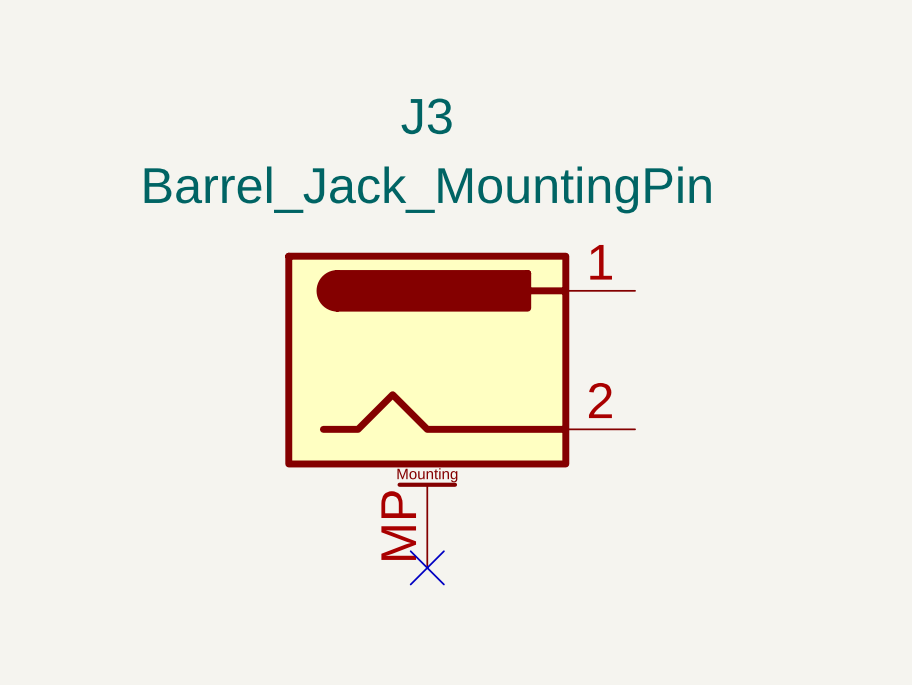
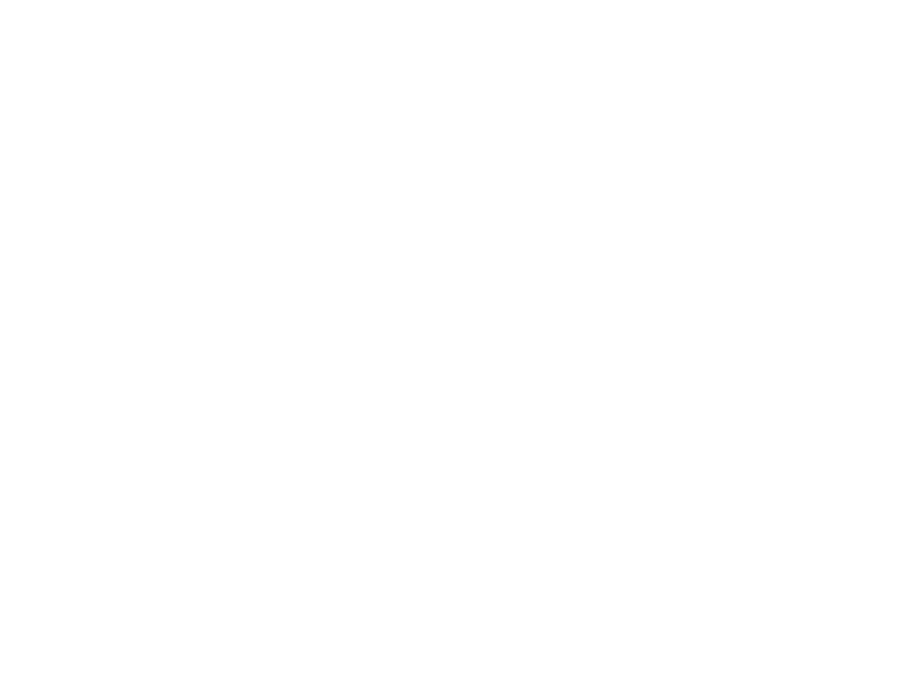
J3: Barrel_Jack_MountingPin (460, 410) -> none
no-connect mark: (427, 567) -> none

